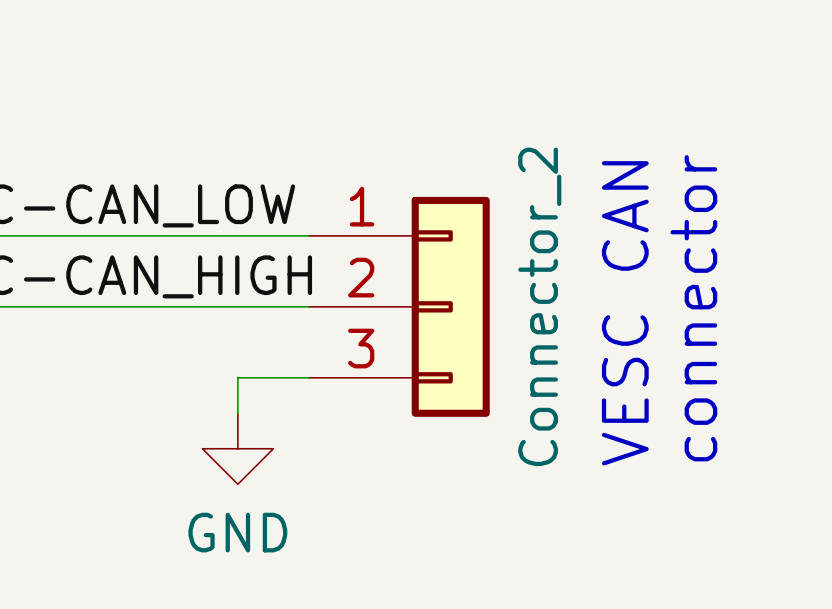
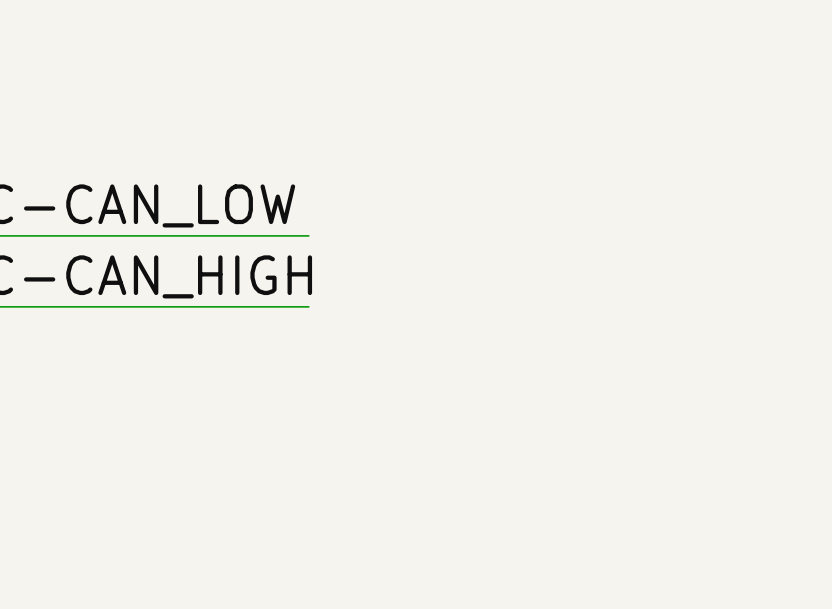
part: Connector_2 (399, 306) -> none
text: connector (693, 308) -> none
text: VESC CAN (625, 313) -> none
wire: (308, 377) (237, 377) (237, 413) -> none
power symbol: GND (237, 448) -> none

